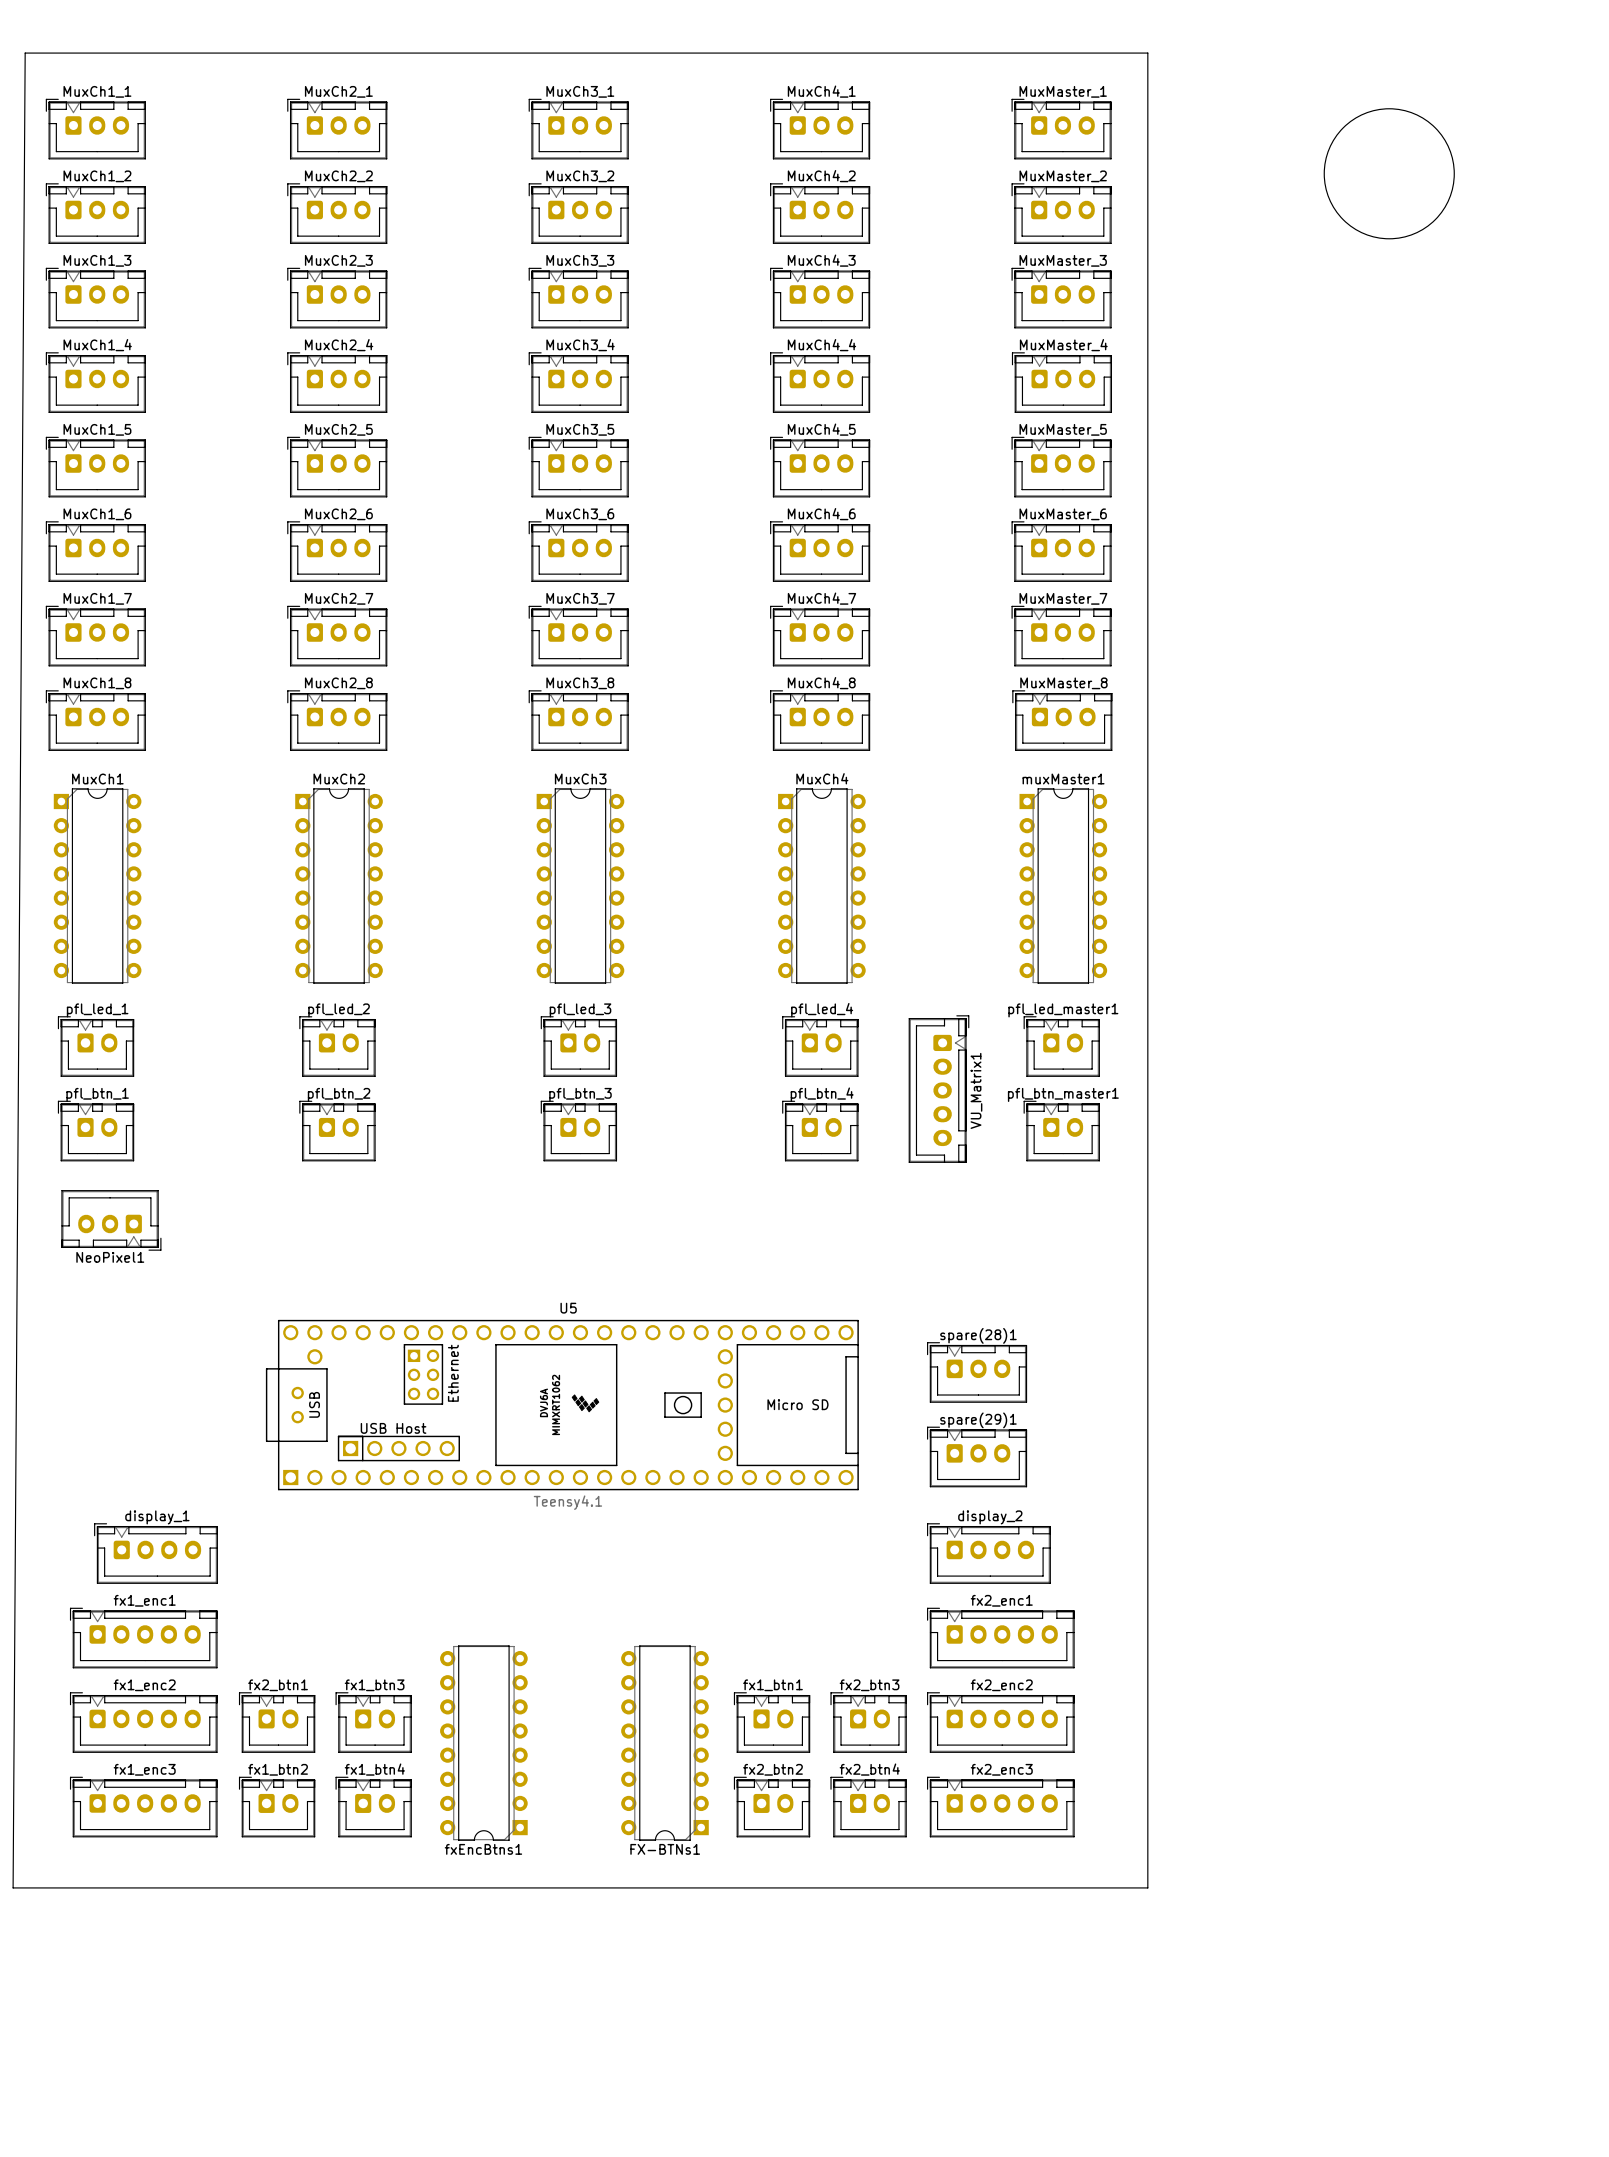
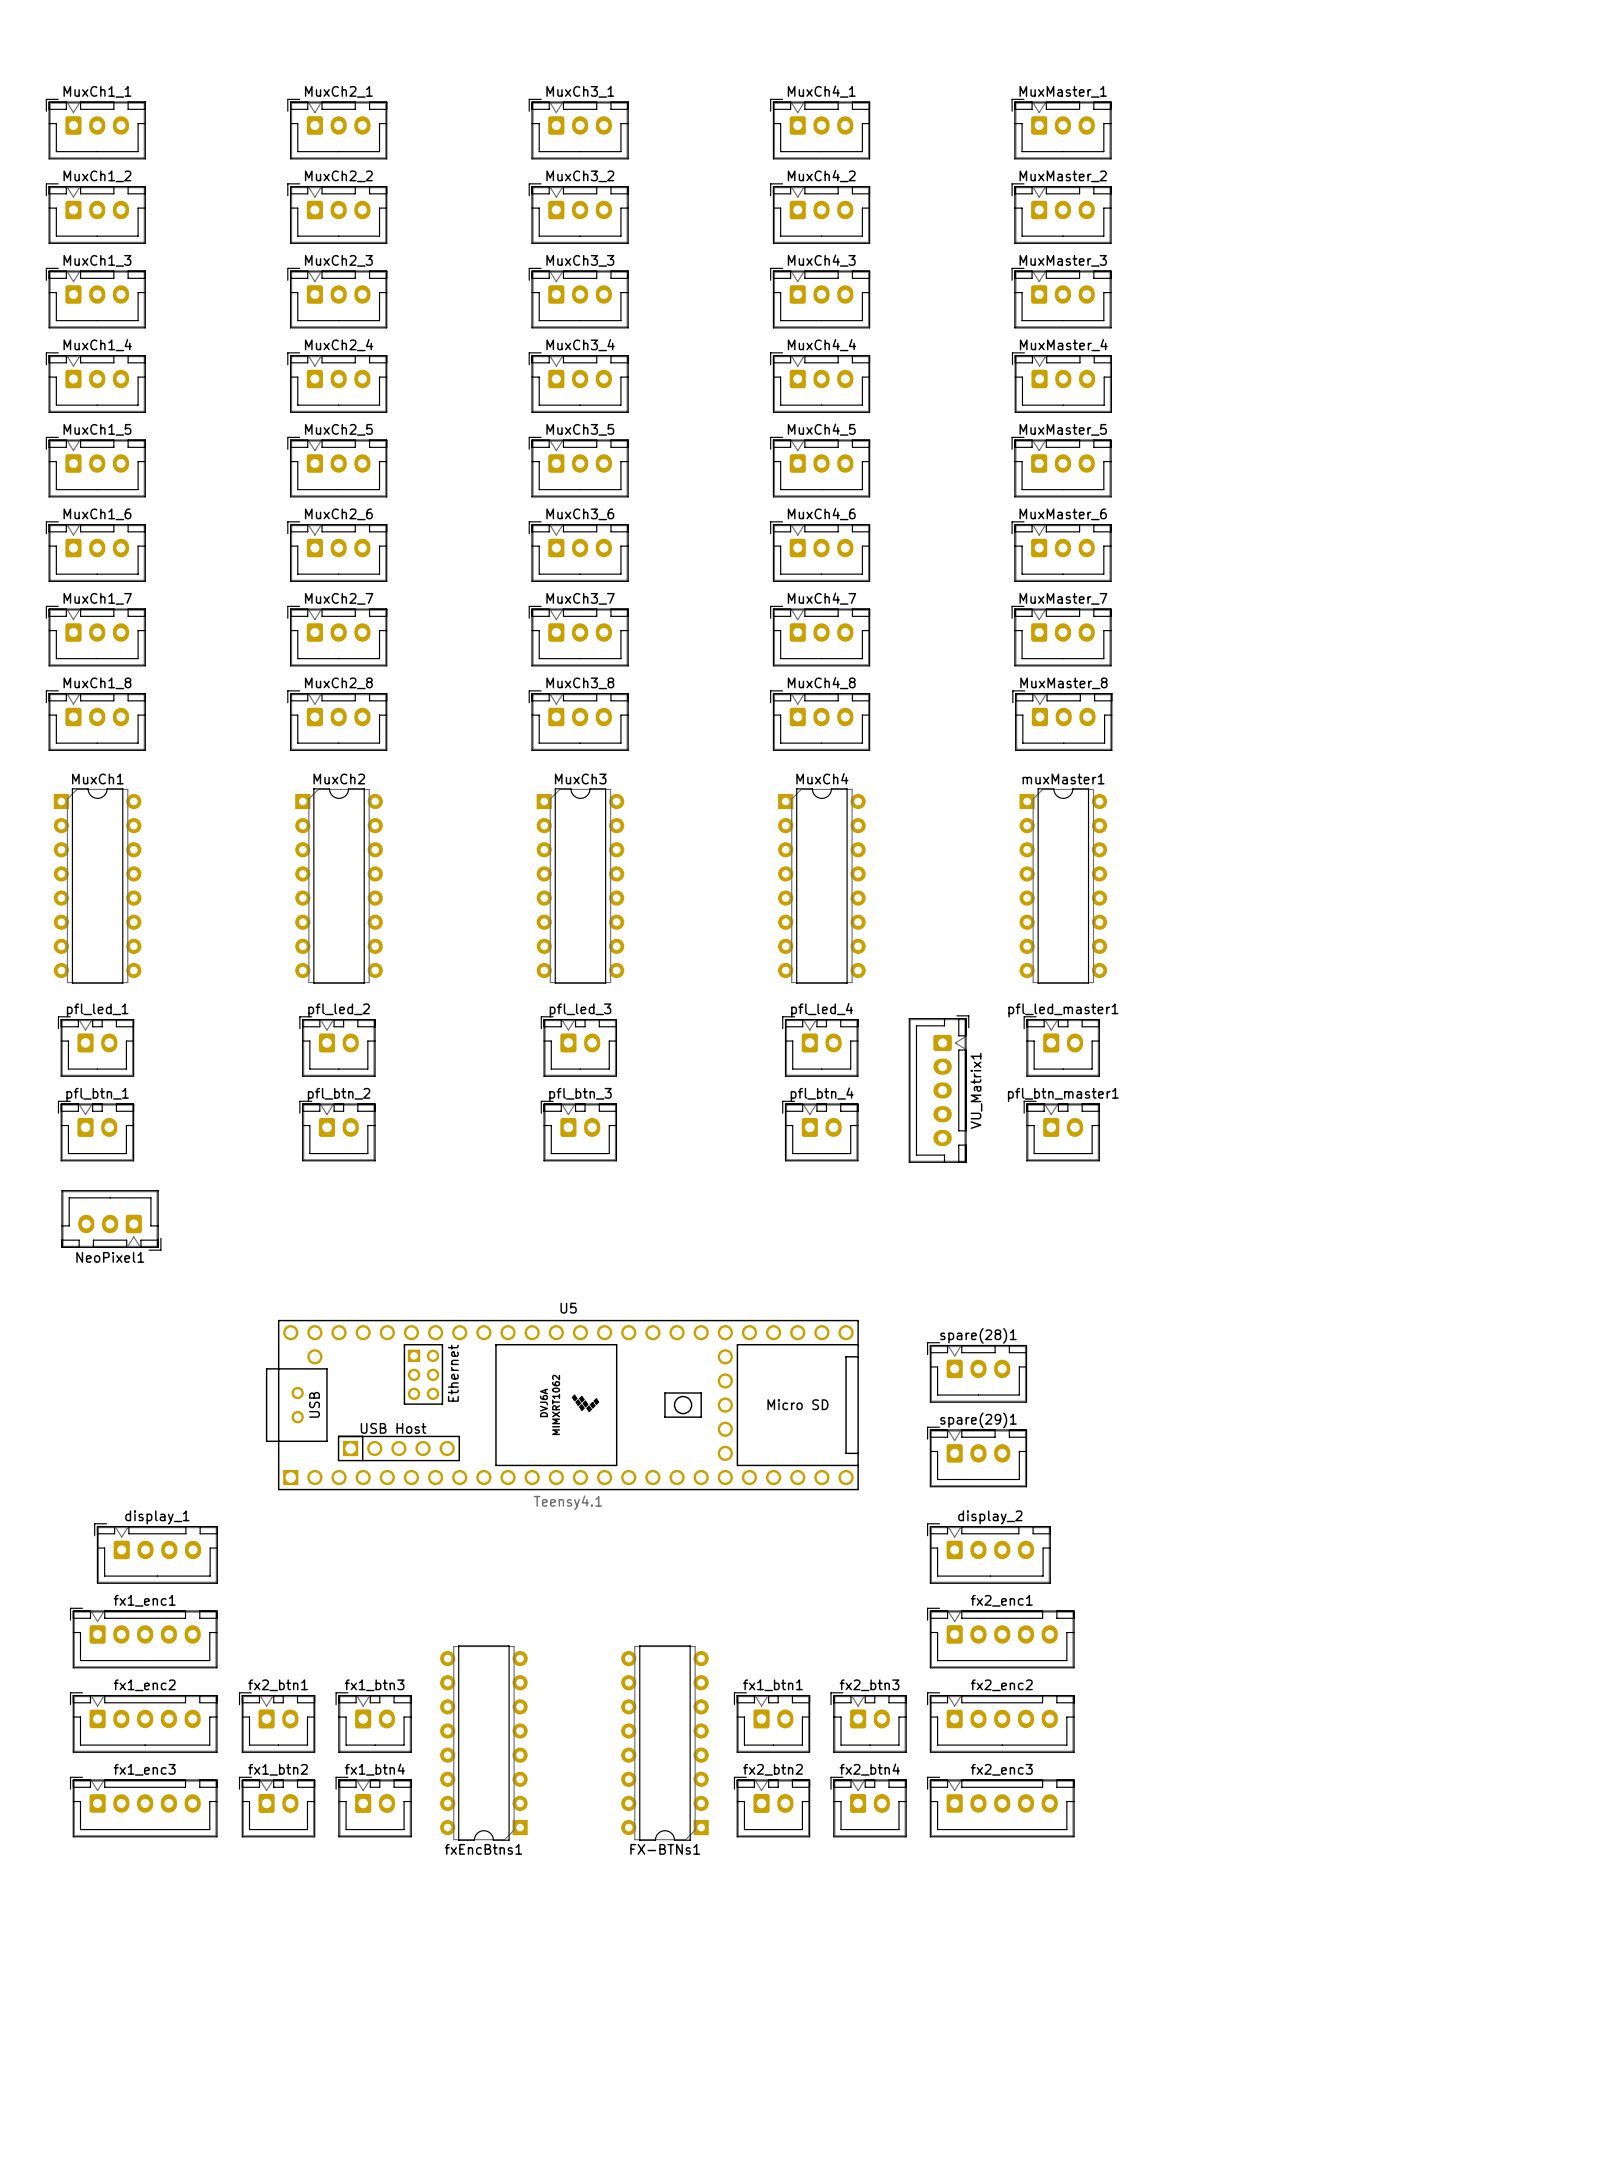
board edge: (25, 53) (13, 1887) (1147, 1887) (1147, 53) (25, 53) -> none
round board edge: [1324, 108, 1455, 240] -> none

